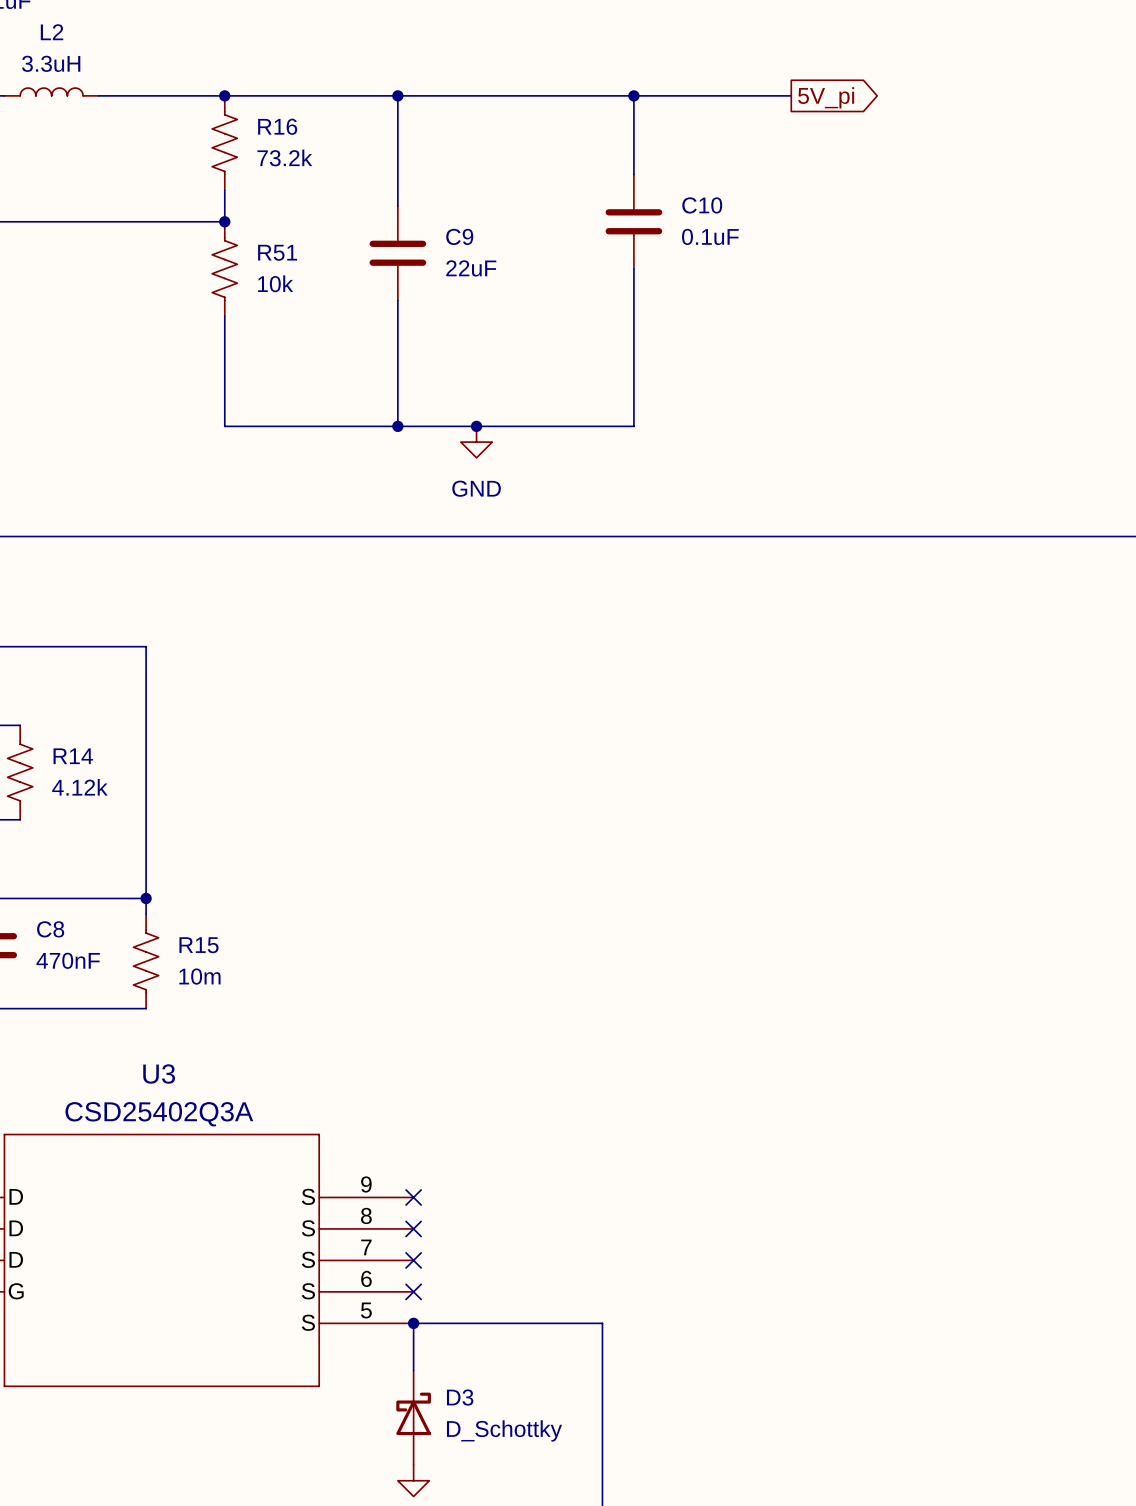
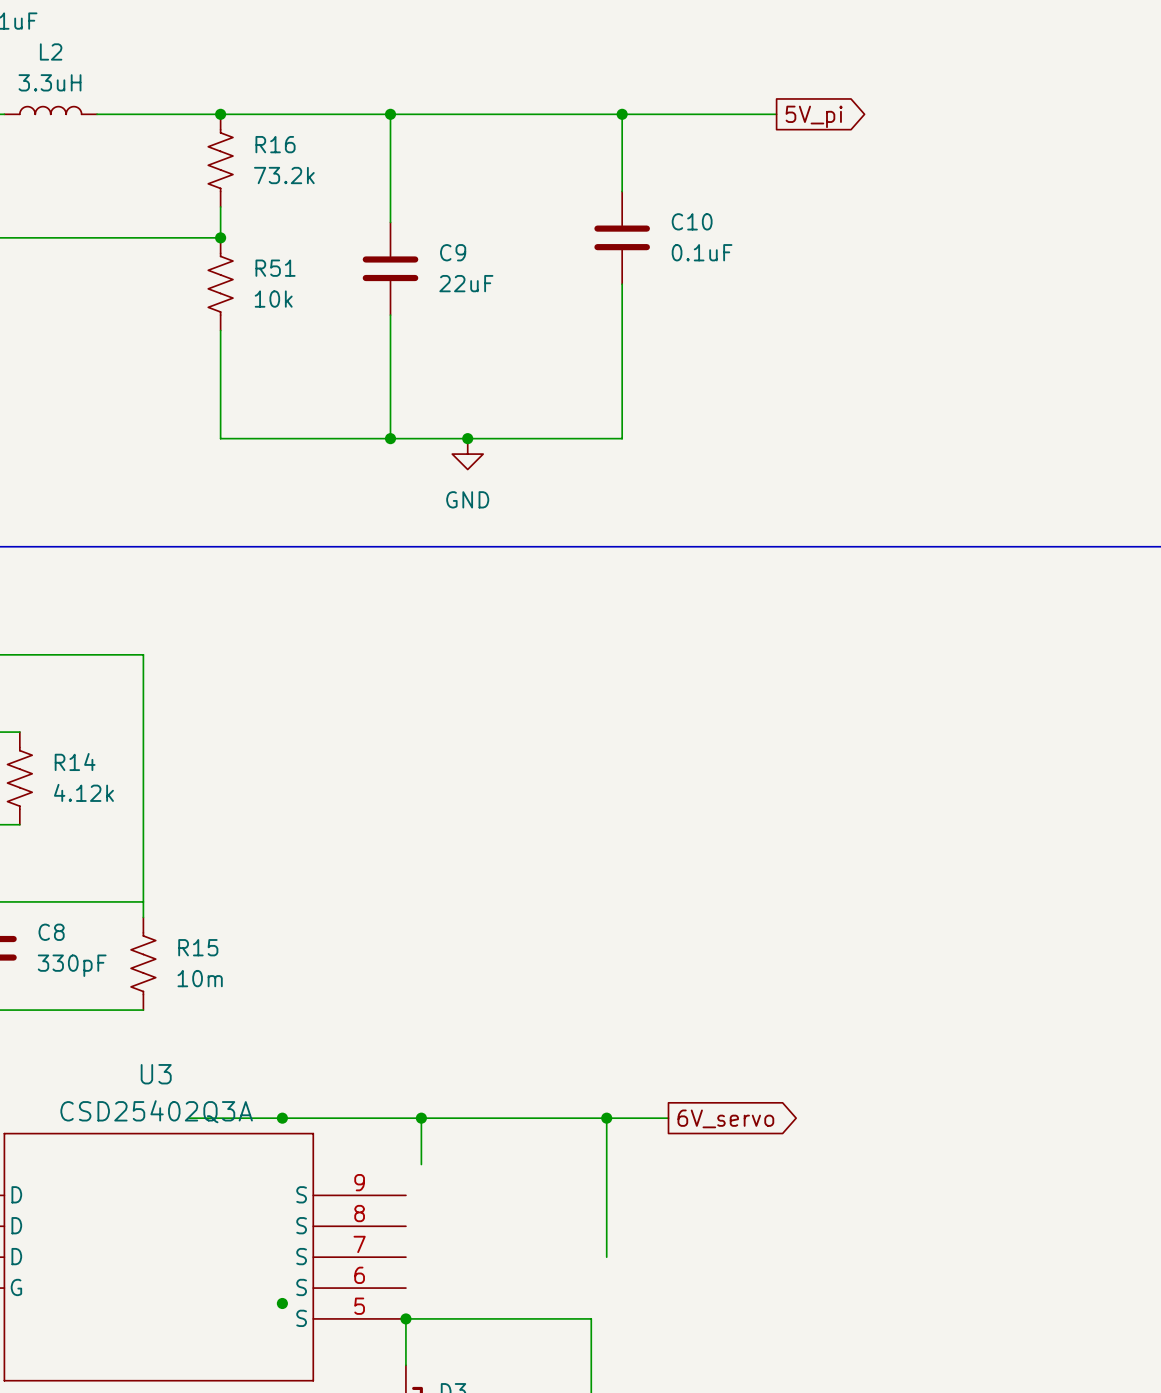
junction: (146, 898) -> none
C8 value: 470nF (68, 960) -> 330pF (72, 965)
wire: none -> (189, 1118) (668, 1118)
junction: none -> (282, 1118)
wire: none -> (421, 1118) (421, 1164)
junction: none -> (421, 1118)
wire: none -> (606, 1118) (606, 1257)
junction: none -> (606, 1118)
global label: none -> 6V_servo (725, 1118)
no-connect mark: (413, 1197) -> none
no-connect mark: (413, 1228) -> none
no-connect mark: (413, 1260) -> none
no-connect mark: (413, 1291) -> none
junction: none -> (282, 1303)

